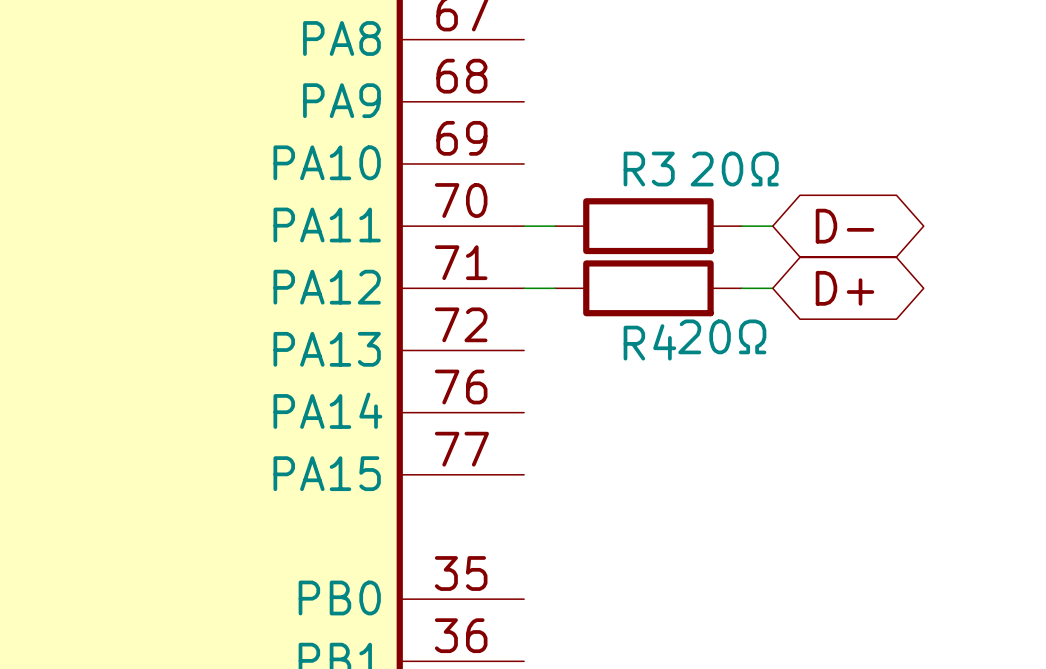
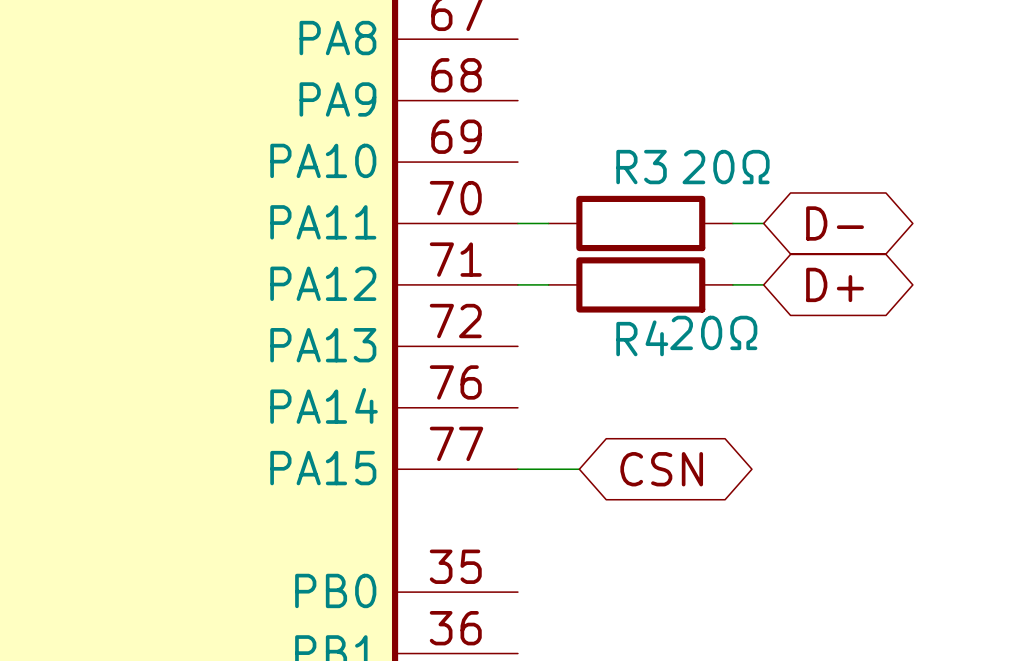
wire: none -> (517, 469) (579, 469)
global label: none -> CSN (661, 469)

